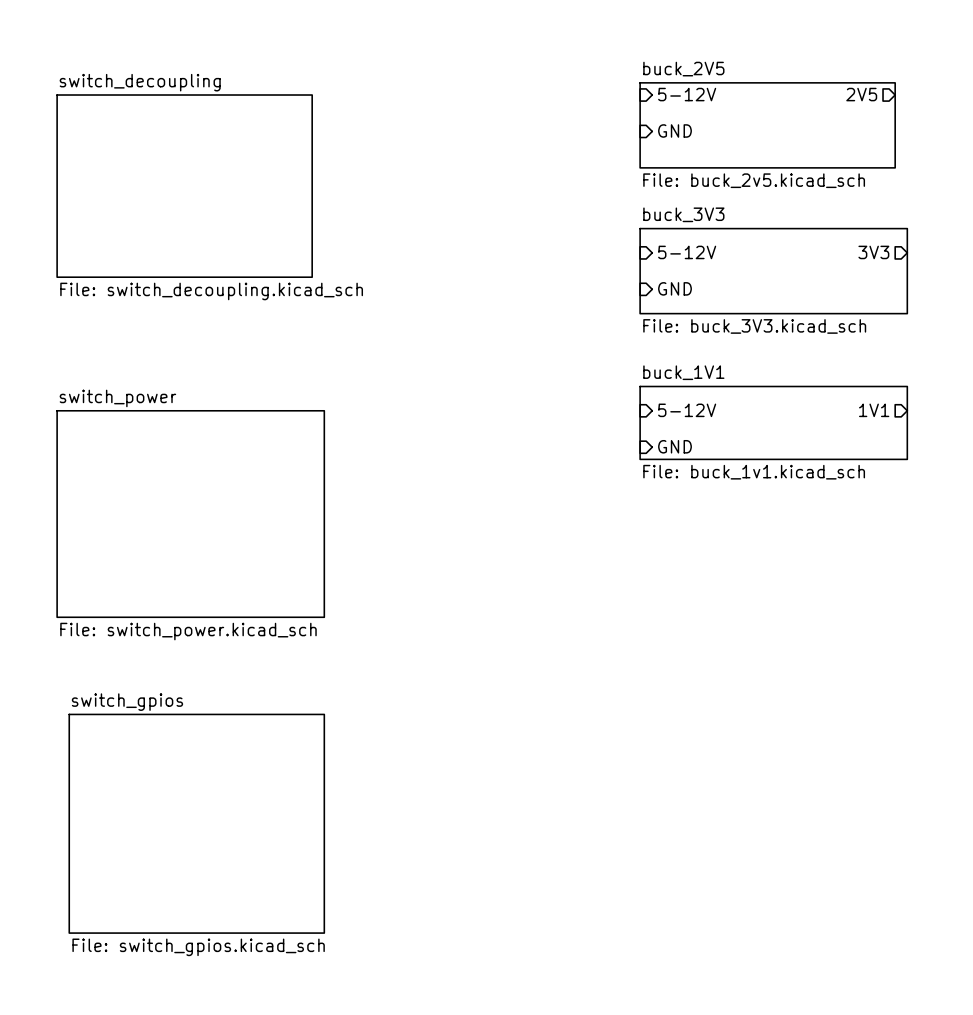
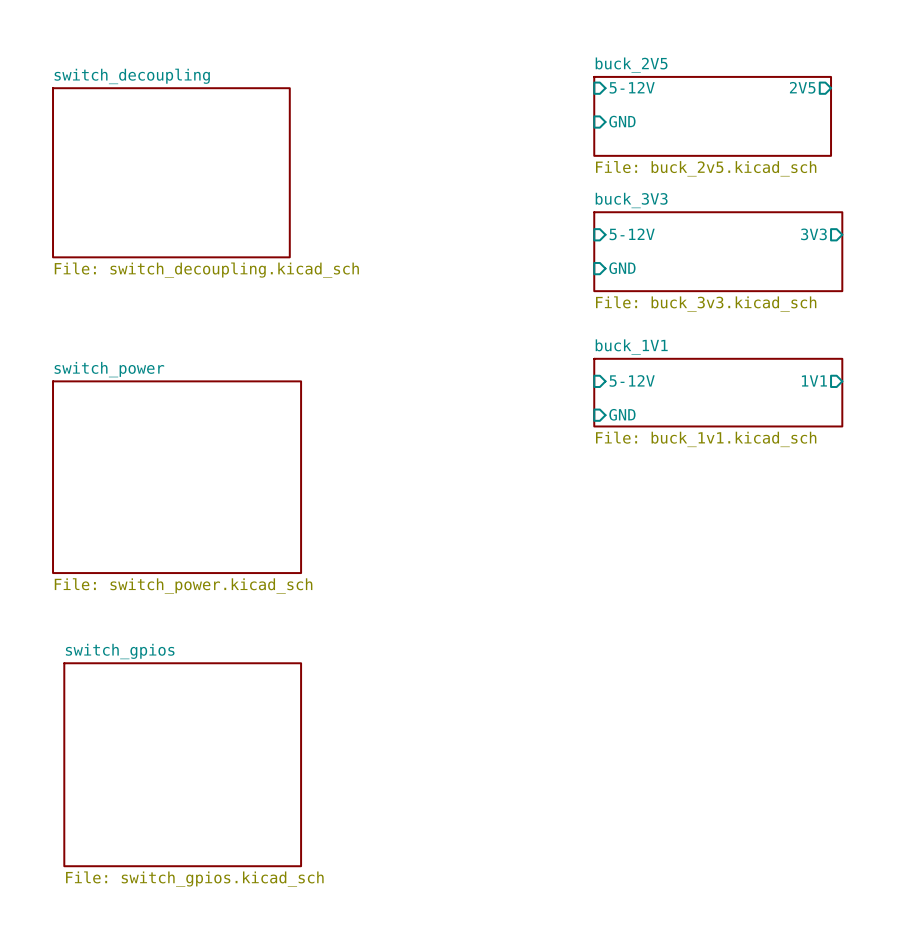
sheet buck_3V3 value: File: buck_3V3.kicad_sch (754, 326) -> File: buck_3v3.kicad_sch (706, 304)

